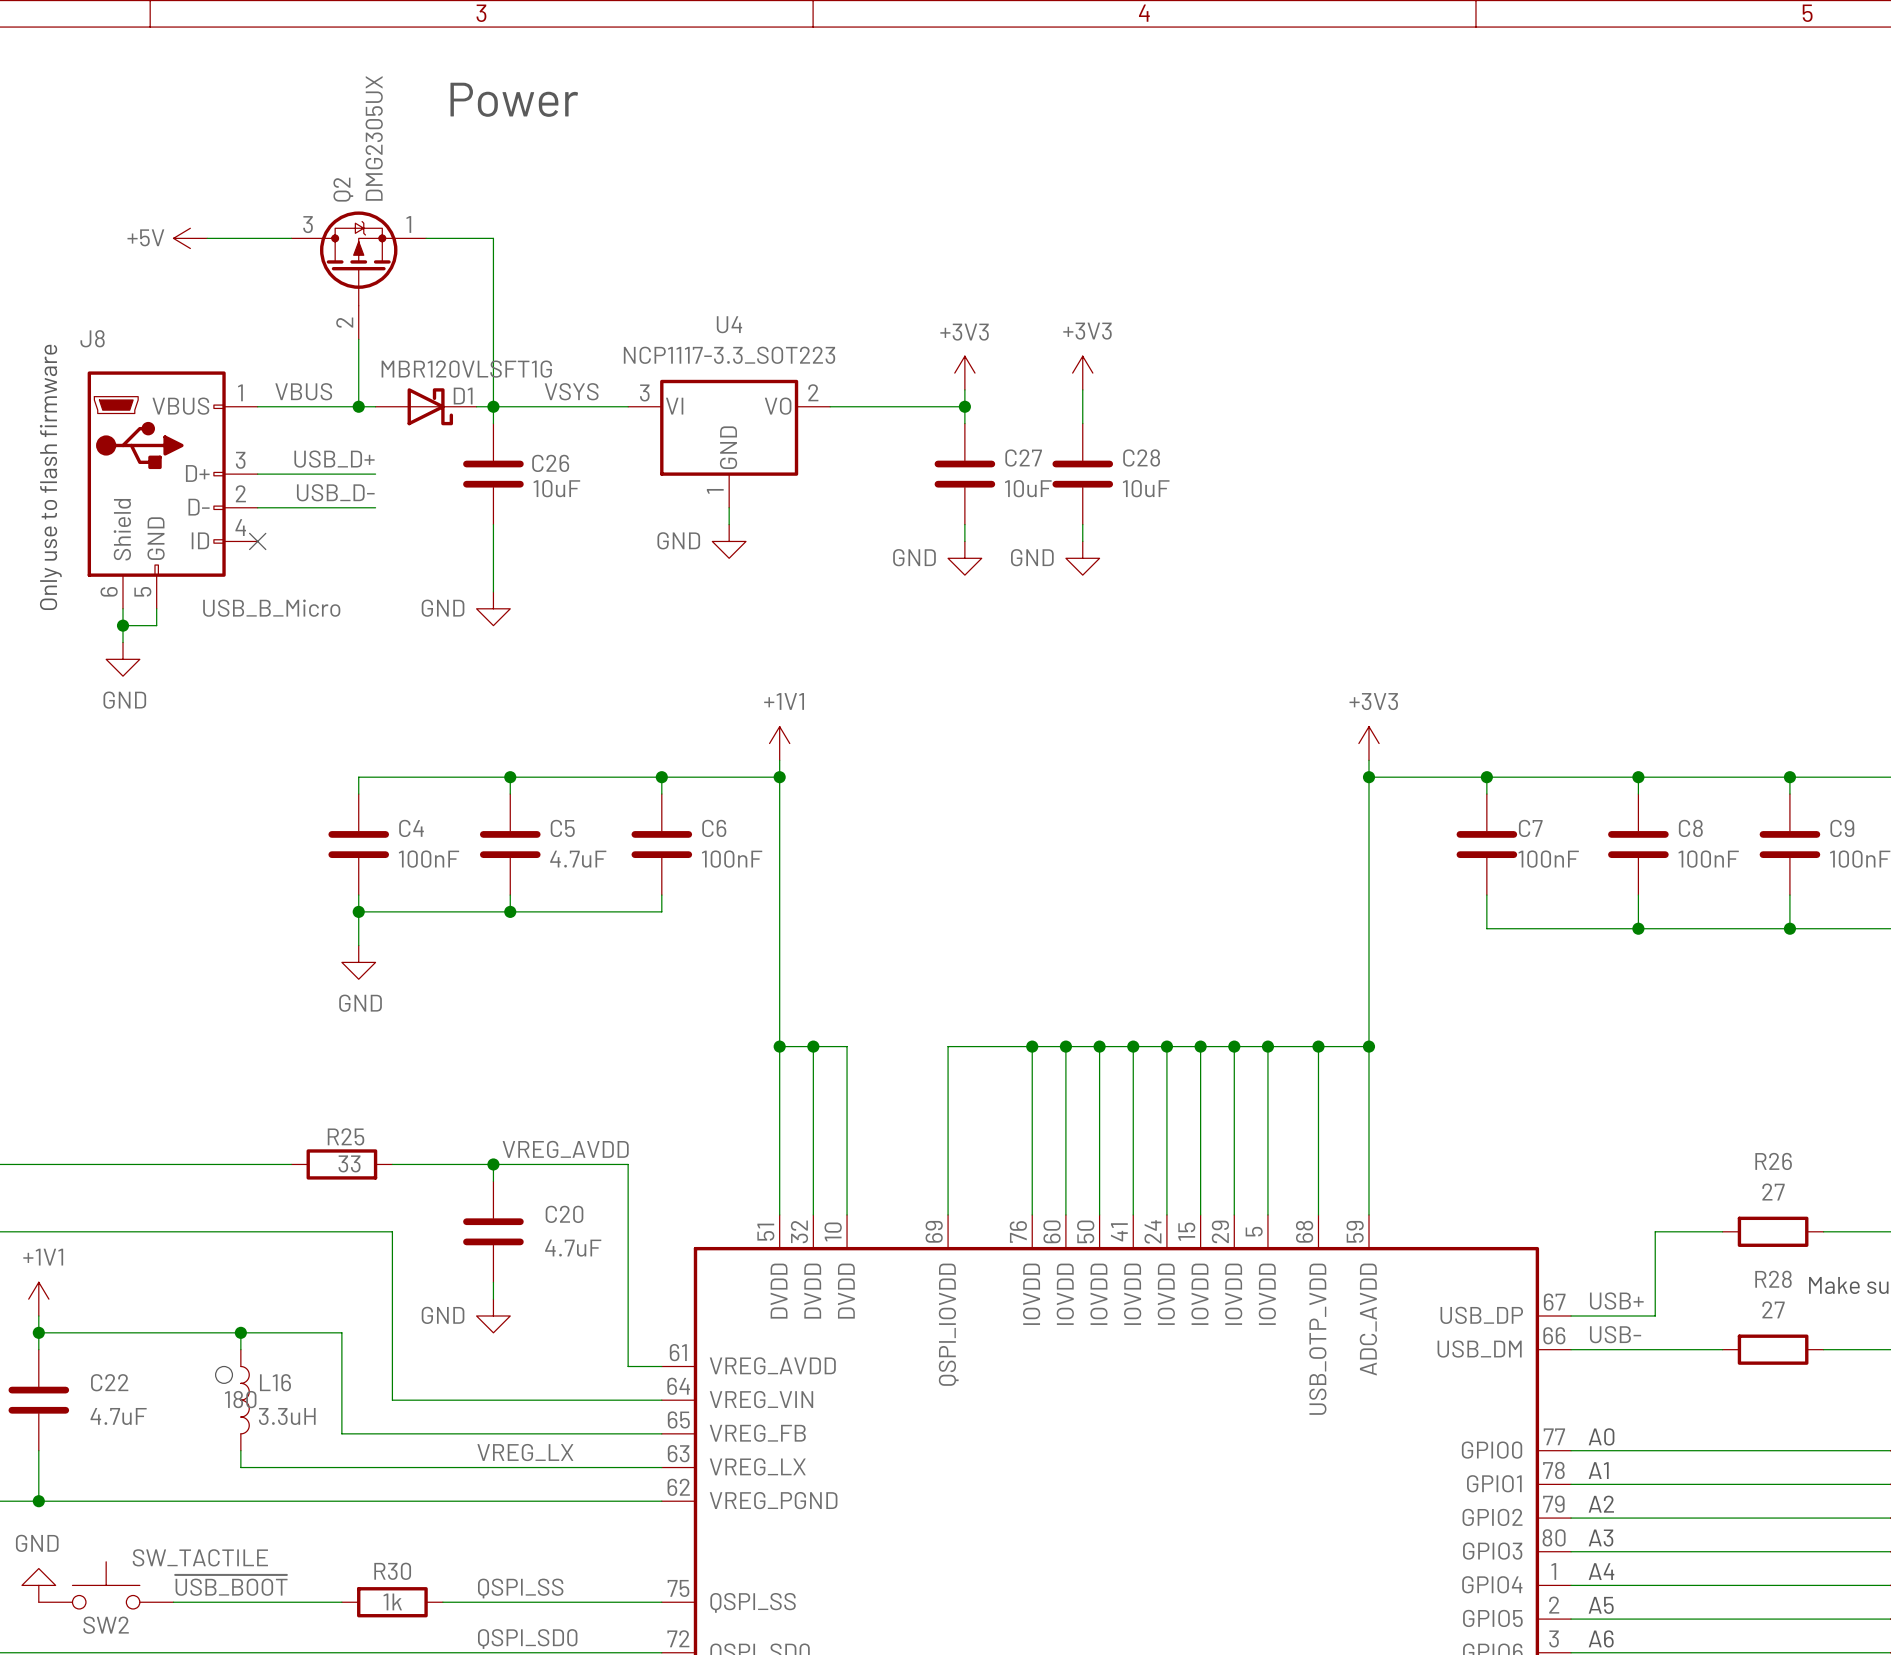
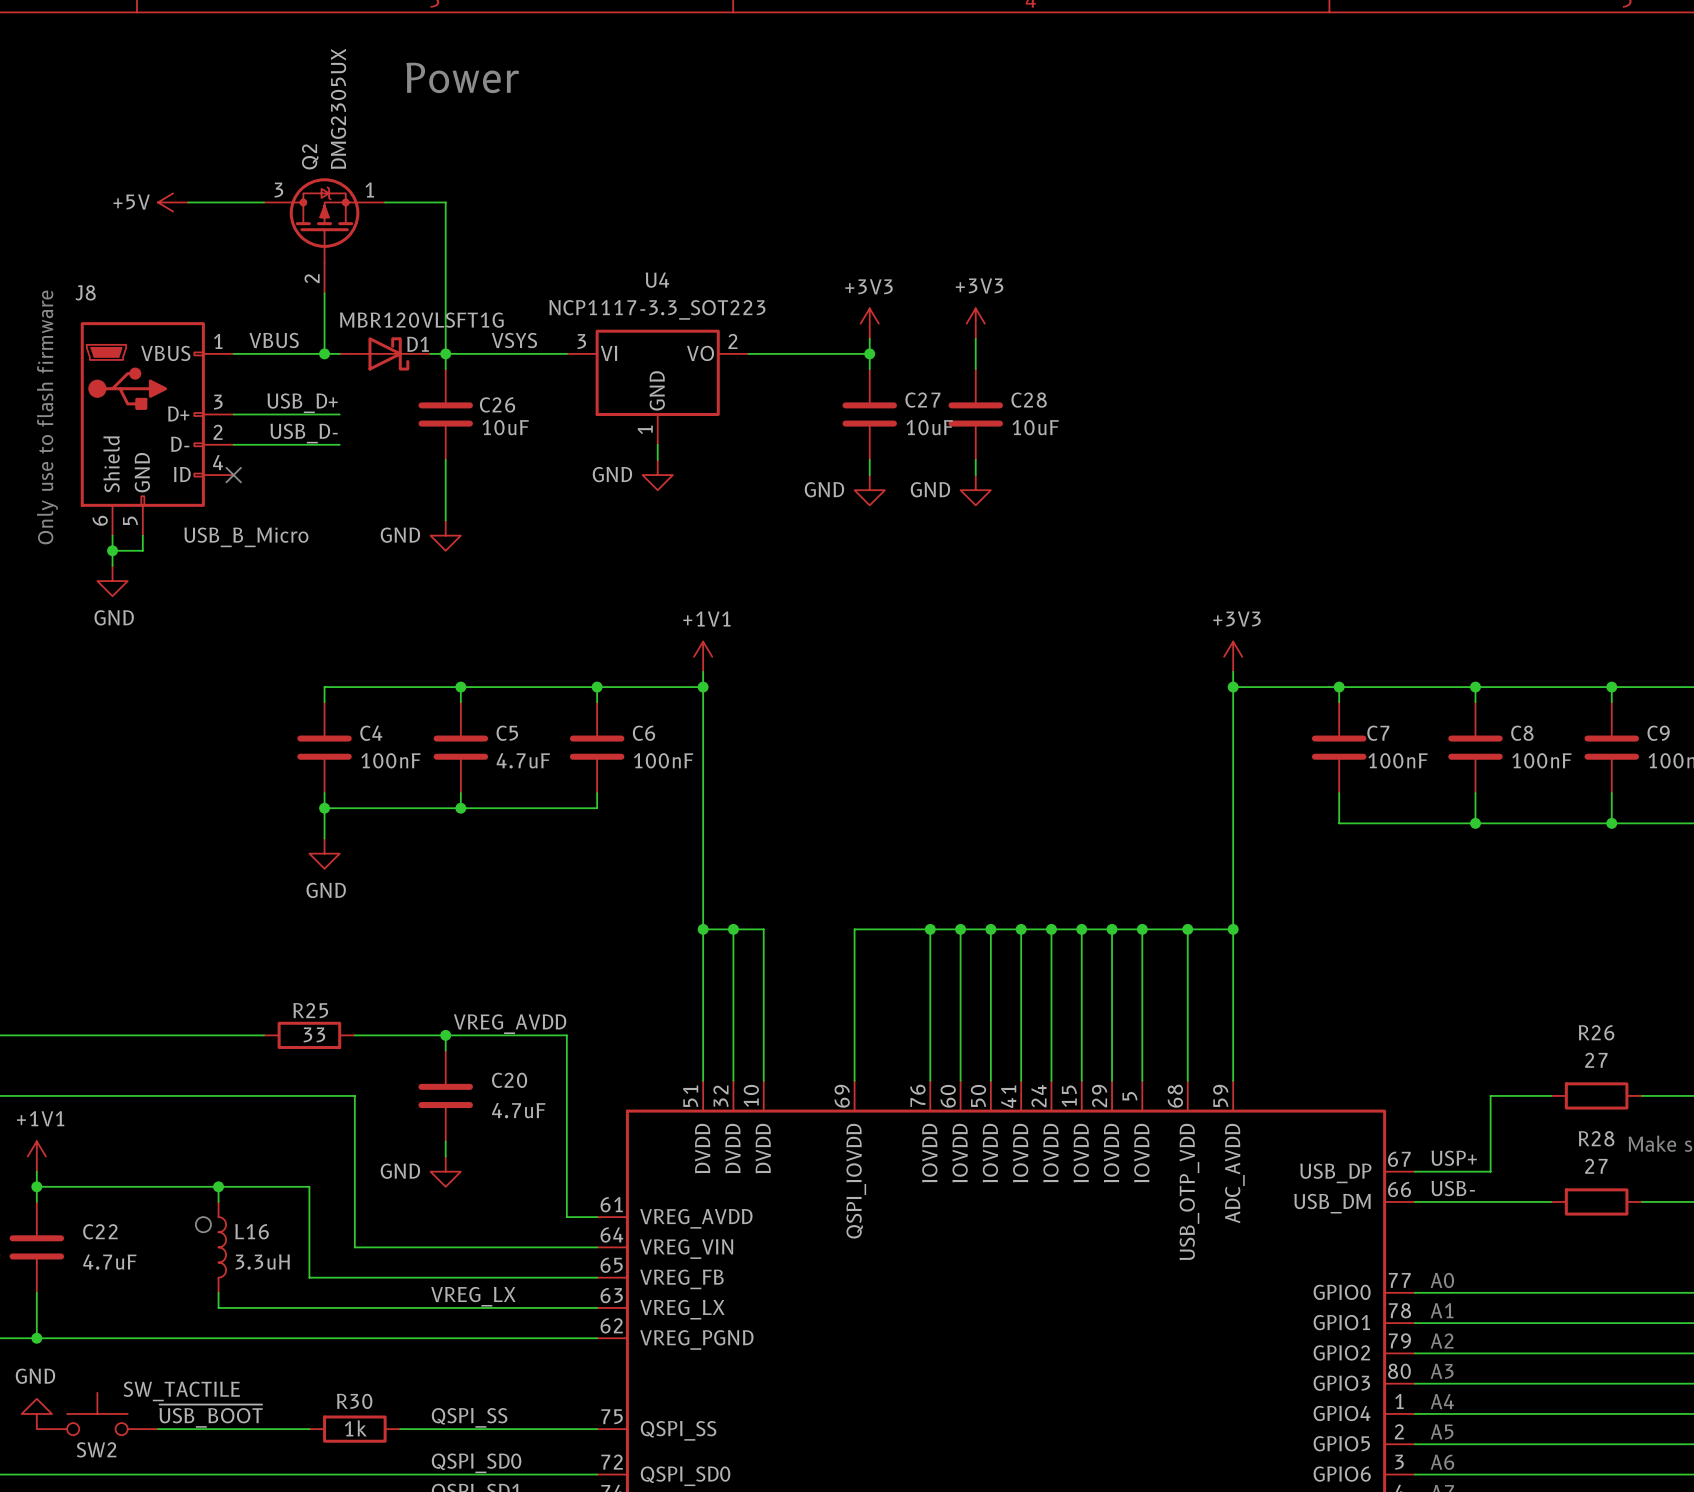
label: USB+ (1616, 1300) -> USP+ (1454, 1158)
L16 text: 180 (240, 1399) -> none

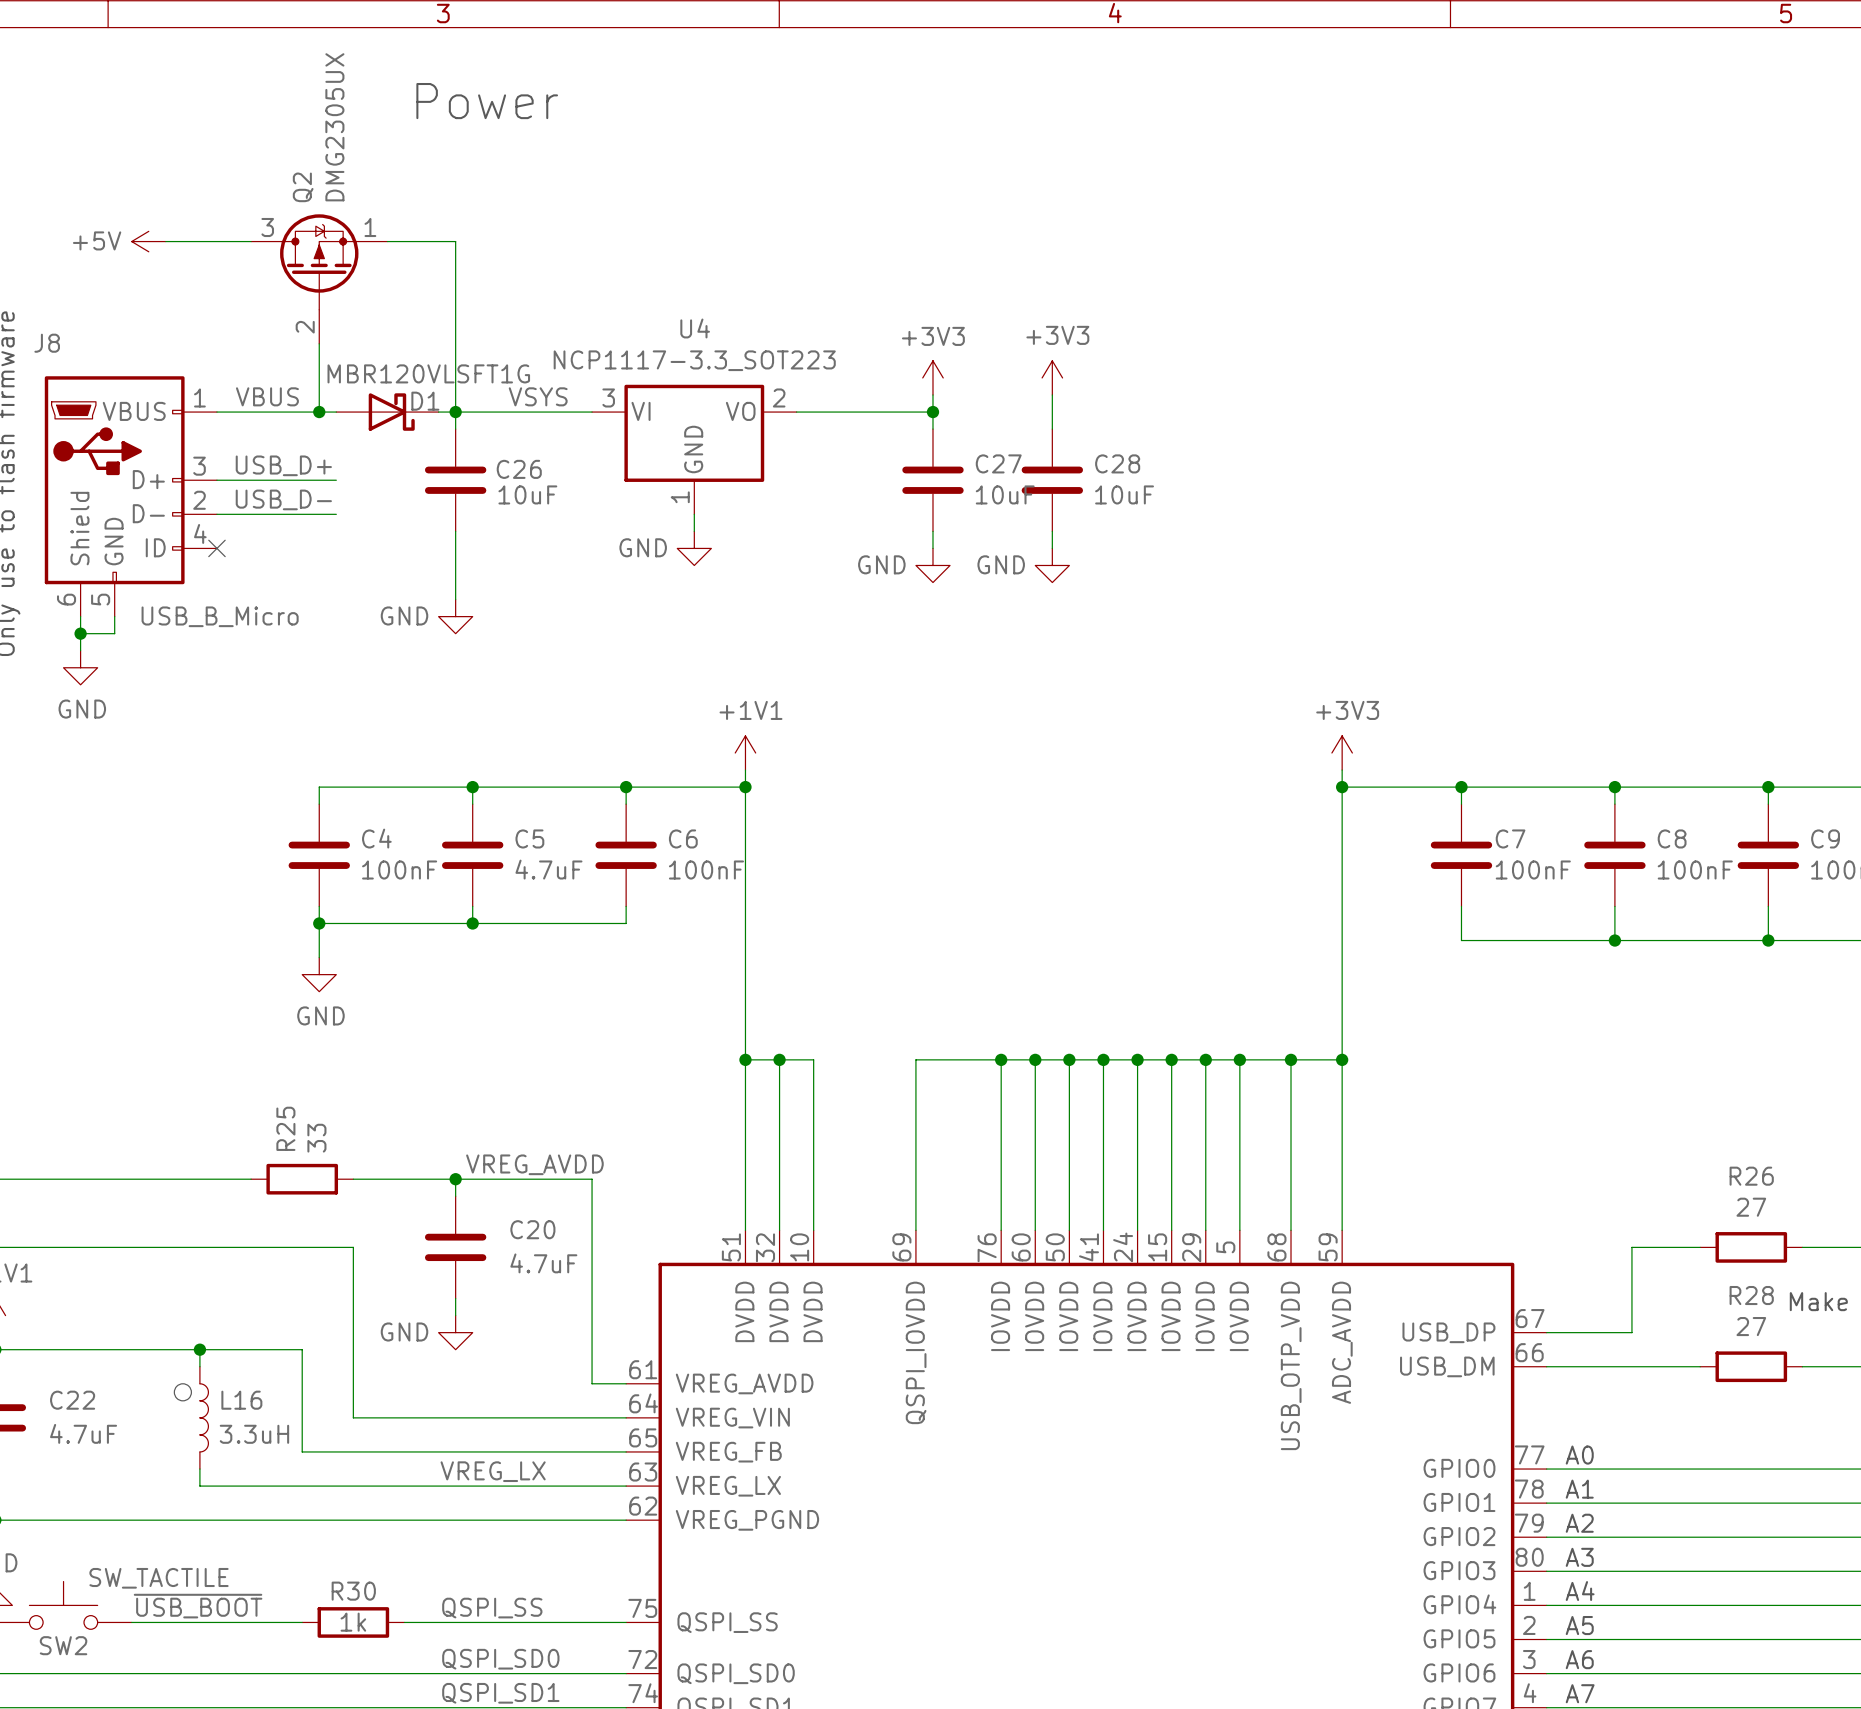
R25 name rotation: 0° (310, 1010) -> 90° counterclockwise (285, 1128)
R25 value rotation: 0° (314, 1034) -> 90° counterclockwise (316, 1138)
R25 value position: 33 (314, 1034) -> 33 (316, 1138)
label: USP+ (1454, 1158) -> none
label: USB- (1453, 1188) -> none

